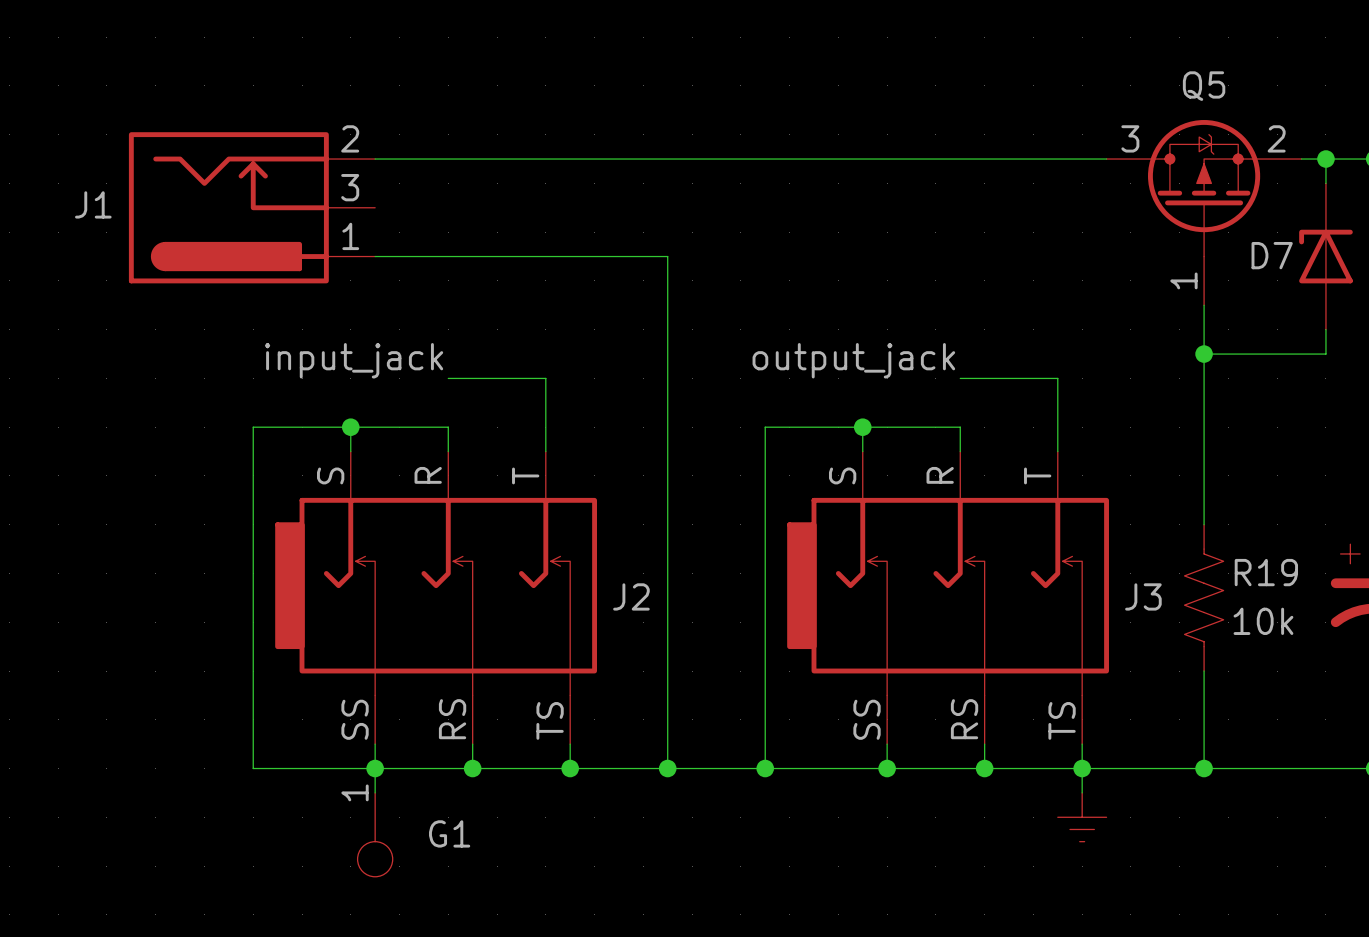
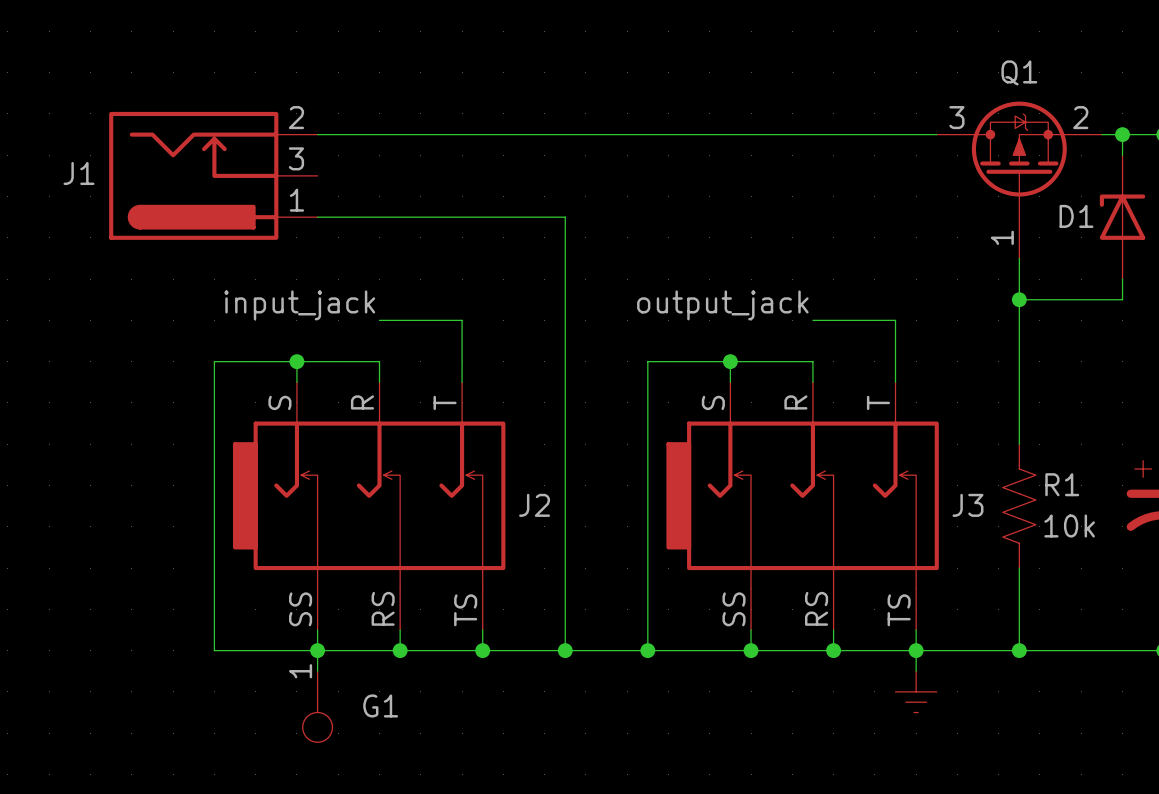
Q5 name: Q5 (1204, 86) -> Q1 (1019, 72)
D7 name: D7 (1272, 255) -> D1 (1076, 216)
R19 name: R19 (1266, 572) -> R1 (1062, 484)

